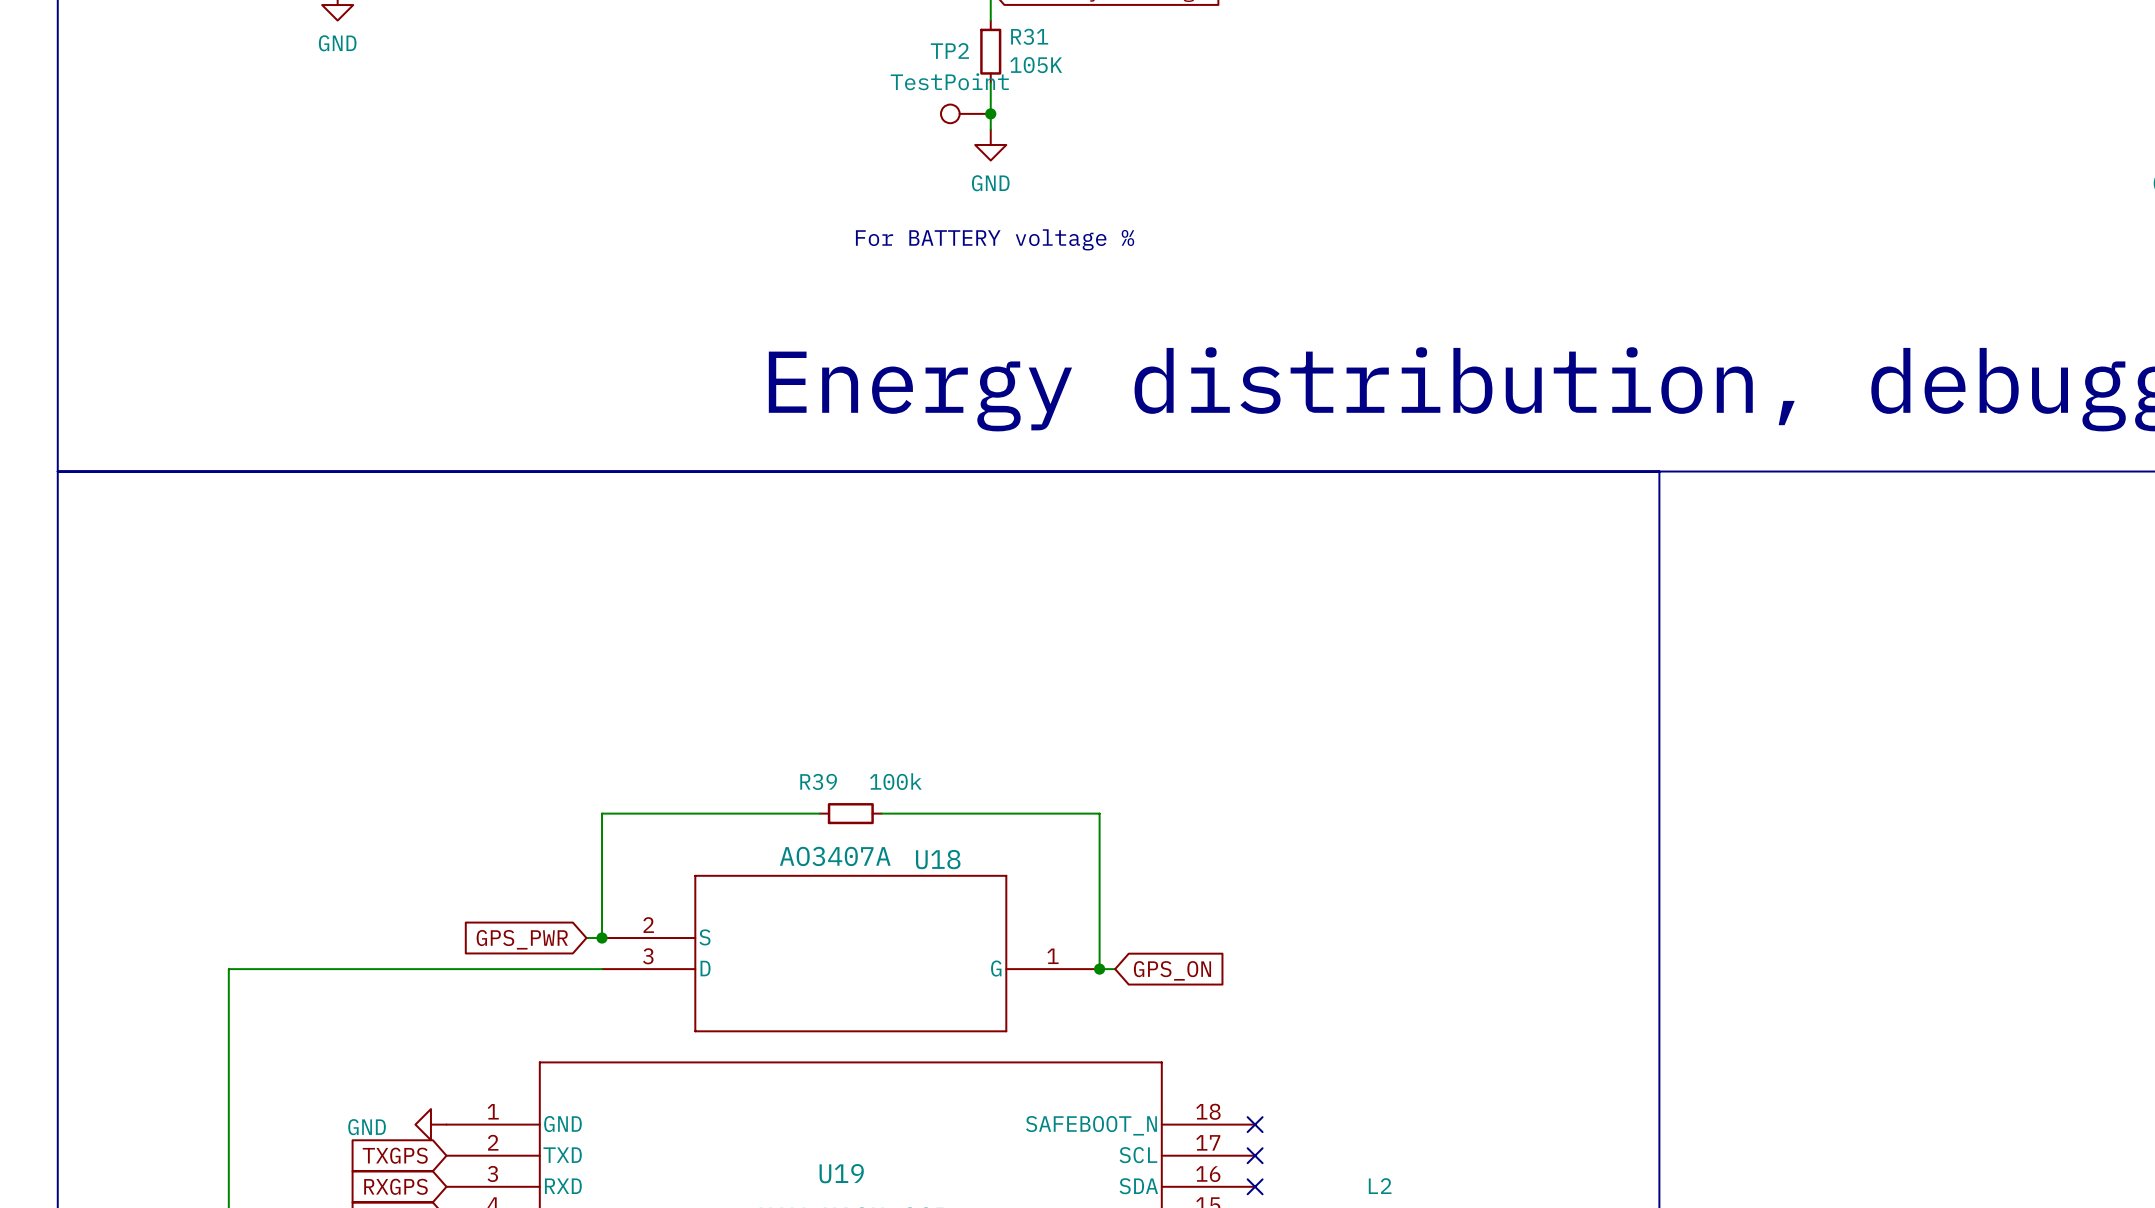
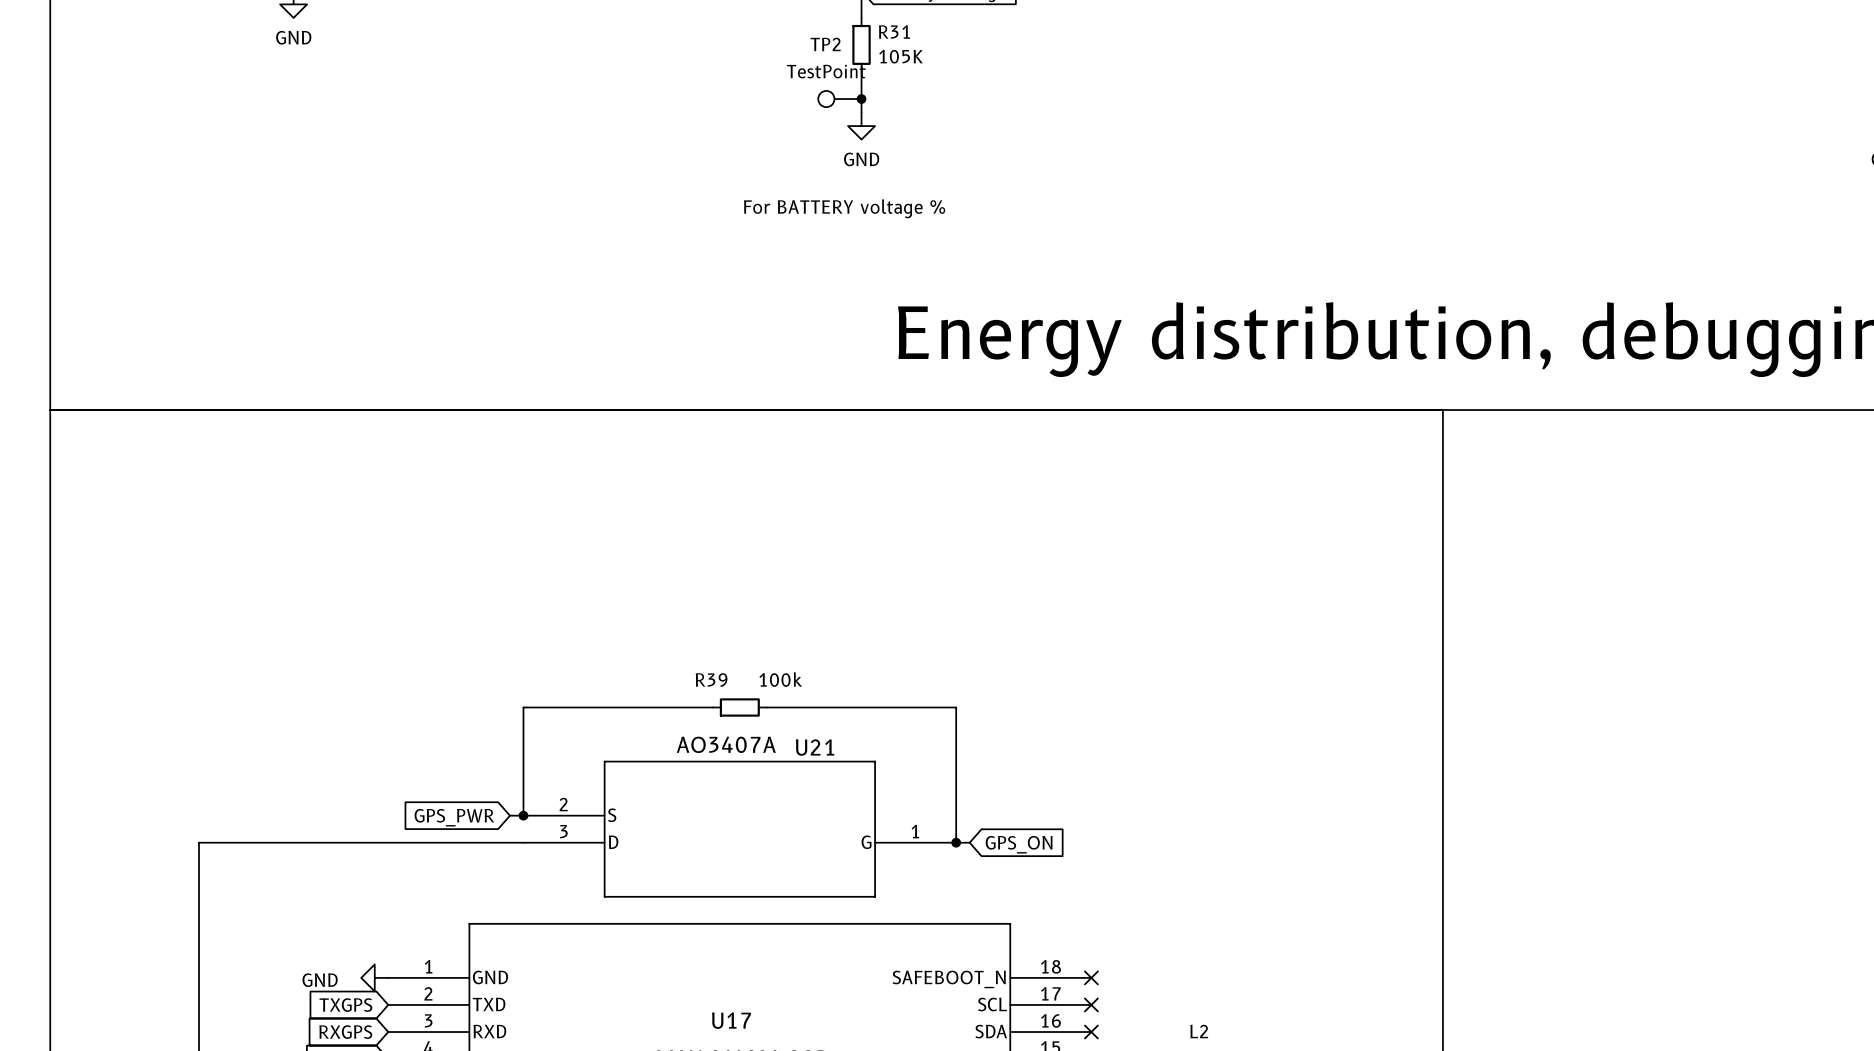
U18 name: U18 (938, 859) -> U21 (815, 747)
U19 name: U19 (841, 1173) -> U17 (731, 1020)

